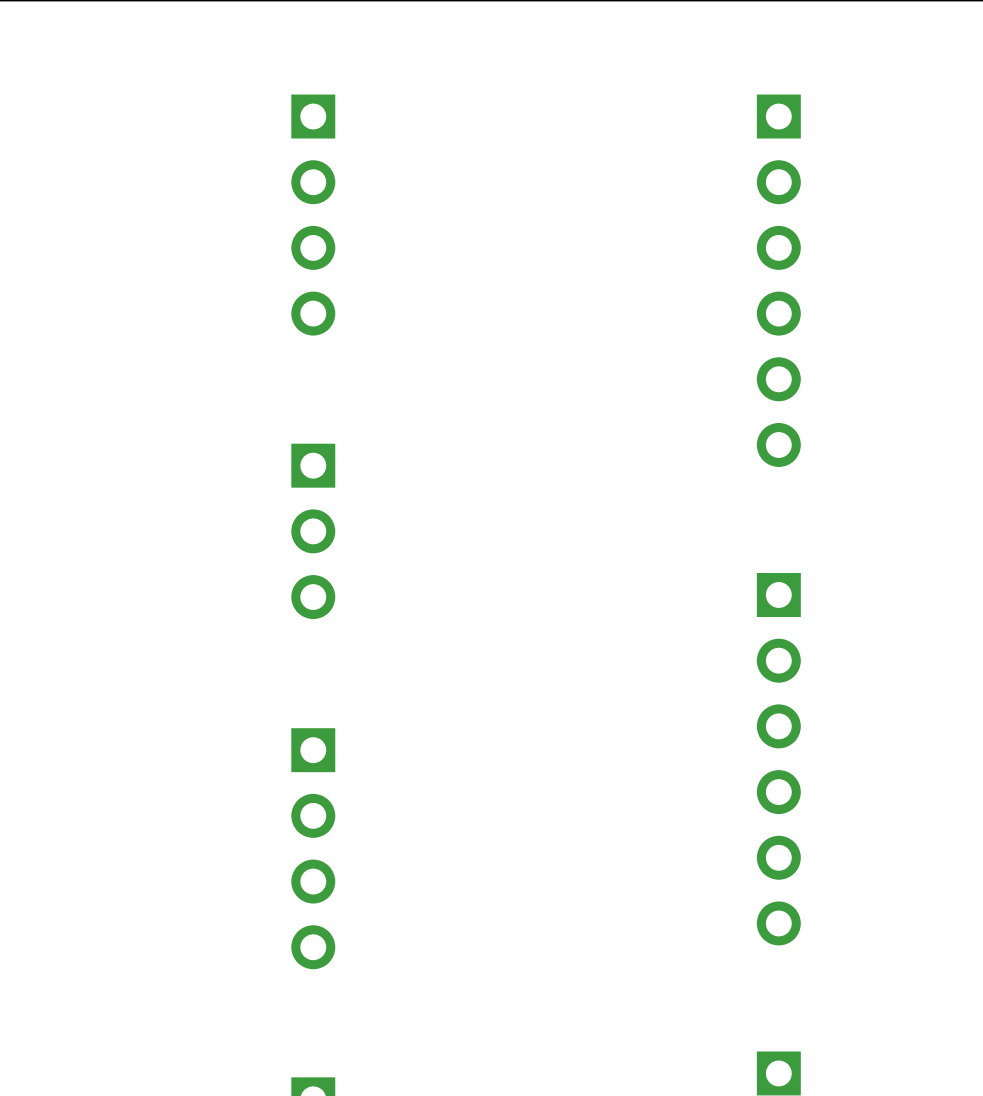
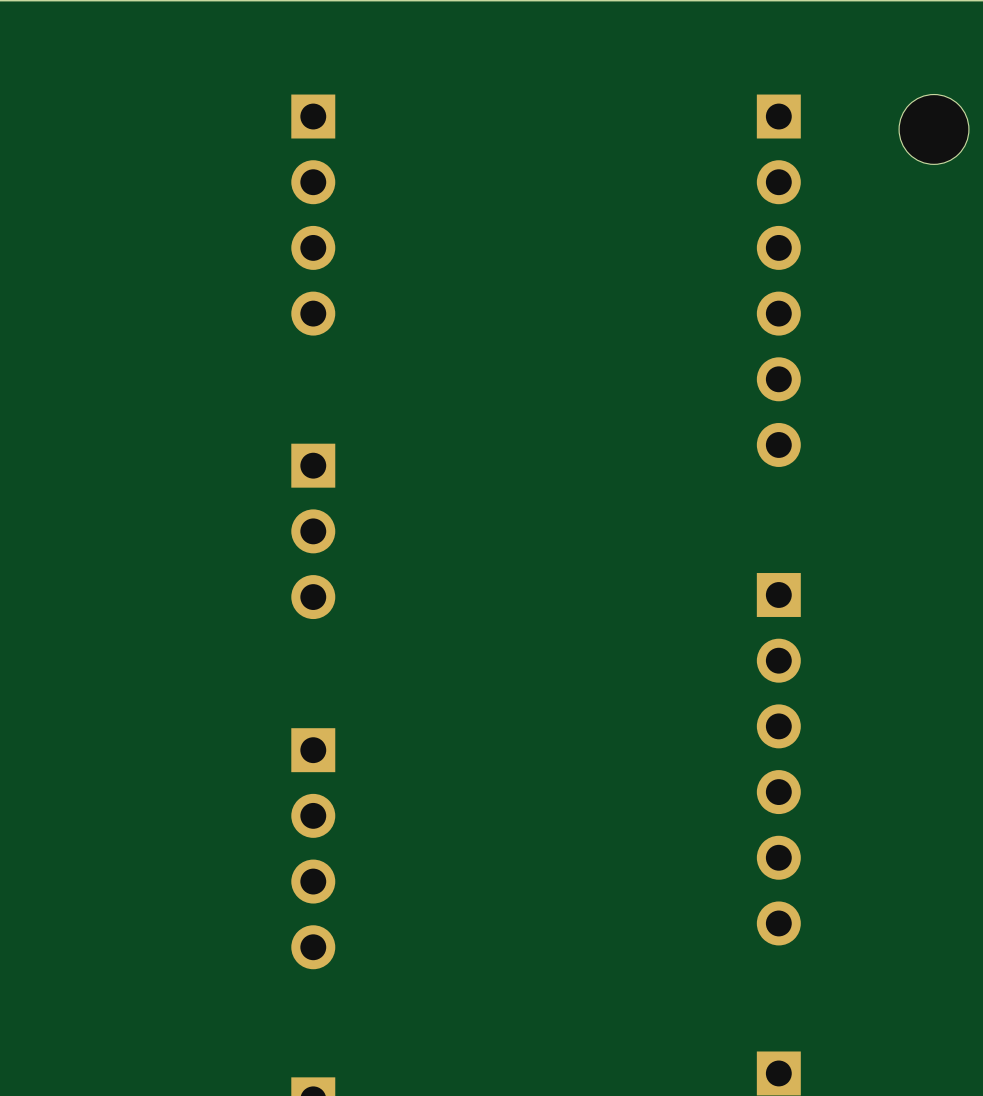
part: none -> (934, 129)

